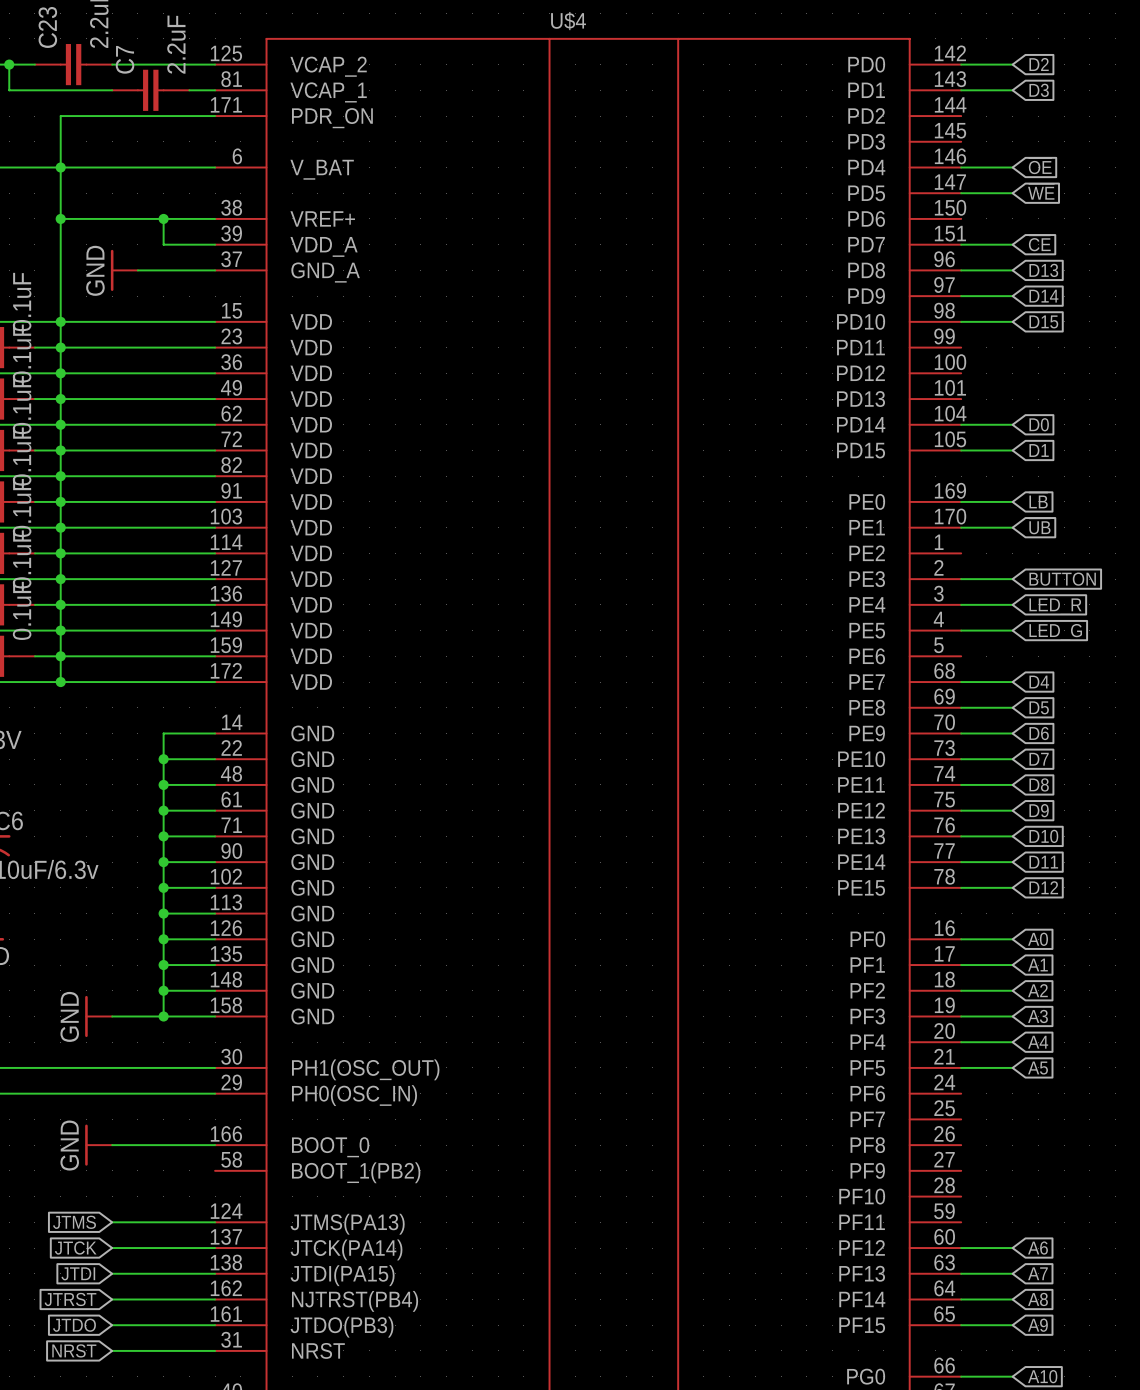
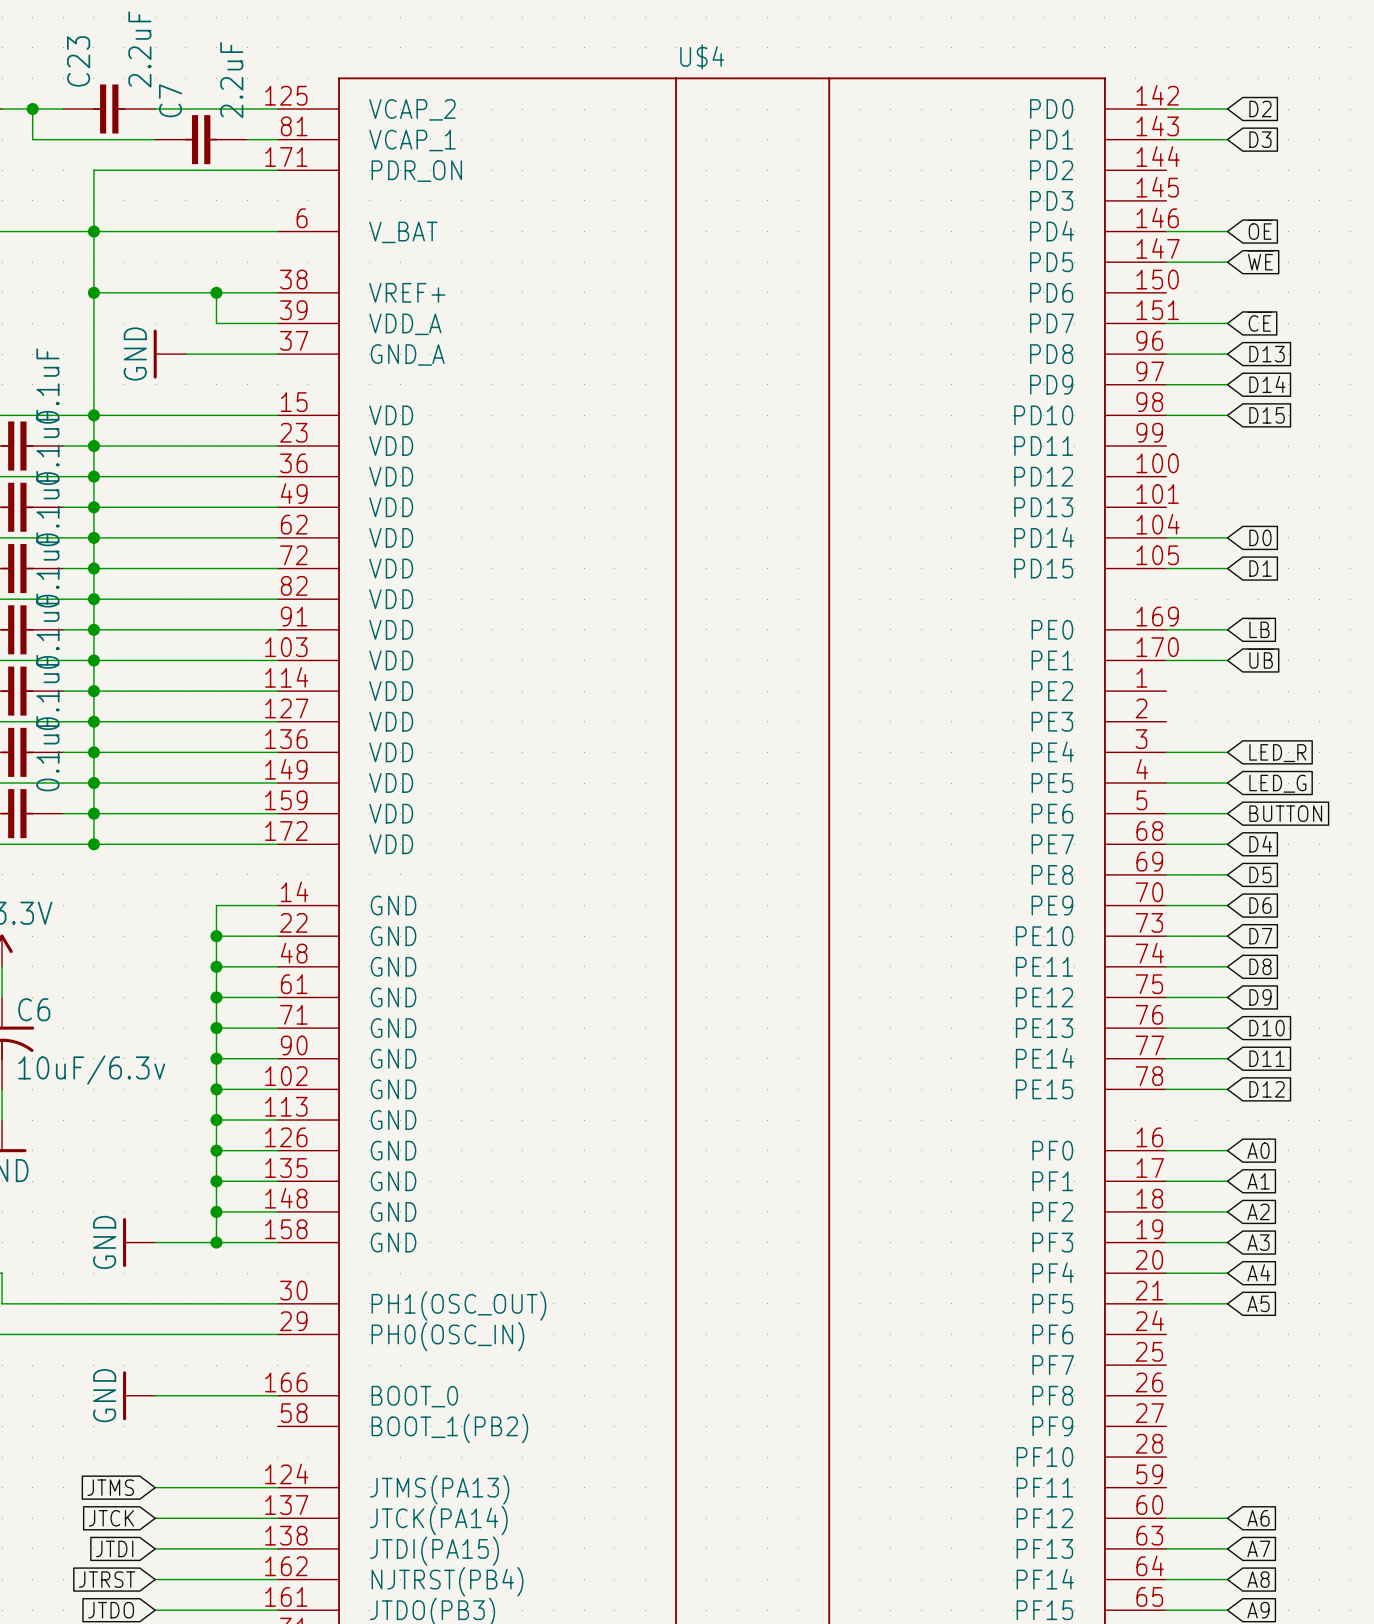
wire: (961, 579) (1012, 579) -> (1166, 813) (1227, 813)
global label position: BUTTON (1062, 579) -> BUTTON (1285, 813)

